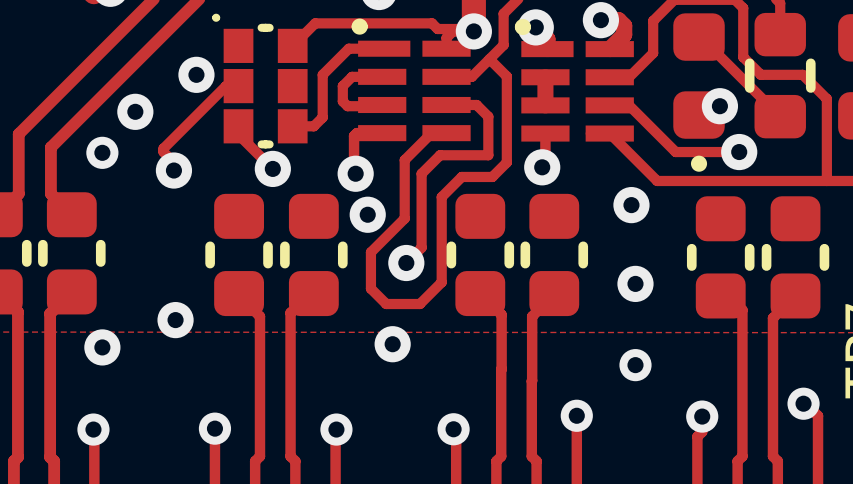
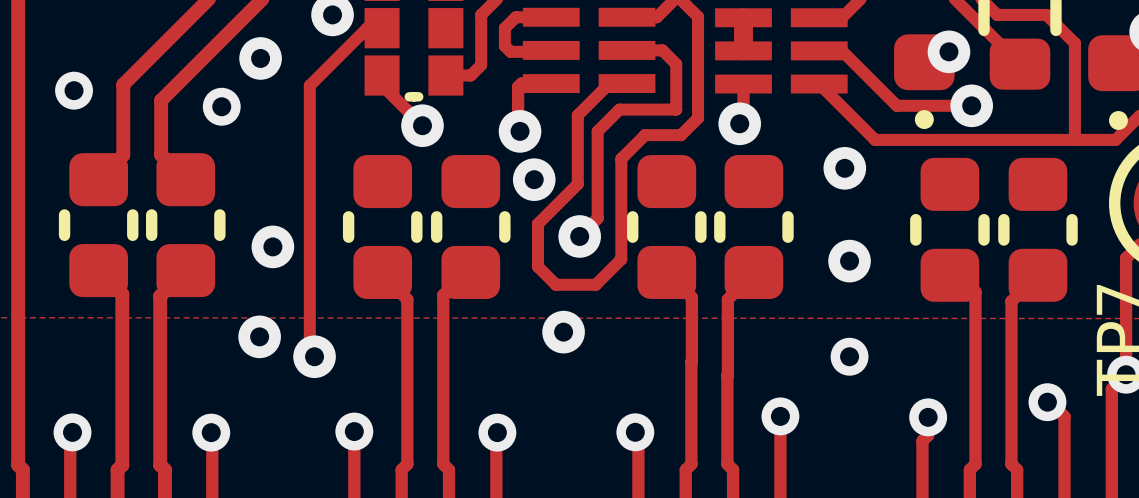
track: (177, 134) (163, 148) (163, 152) (173, 162) (173, 170) -> (309, 85) (309, 352) (314, 356)
via: (173, 170) -> none
via: none -> (272, 246)
via: (175, 320) -> none
via position: (102, 347) -> (259, 336)
via: none -> (314, 356)

